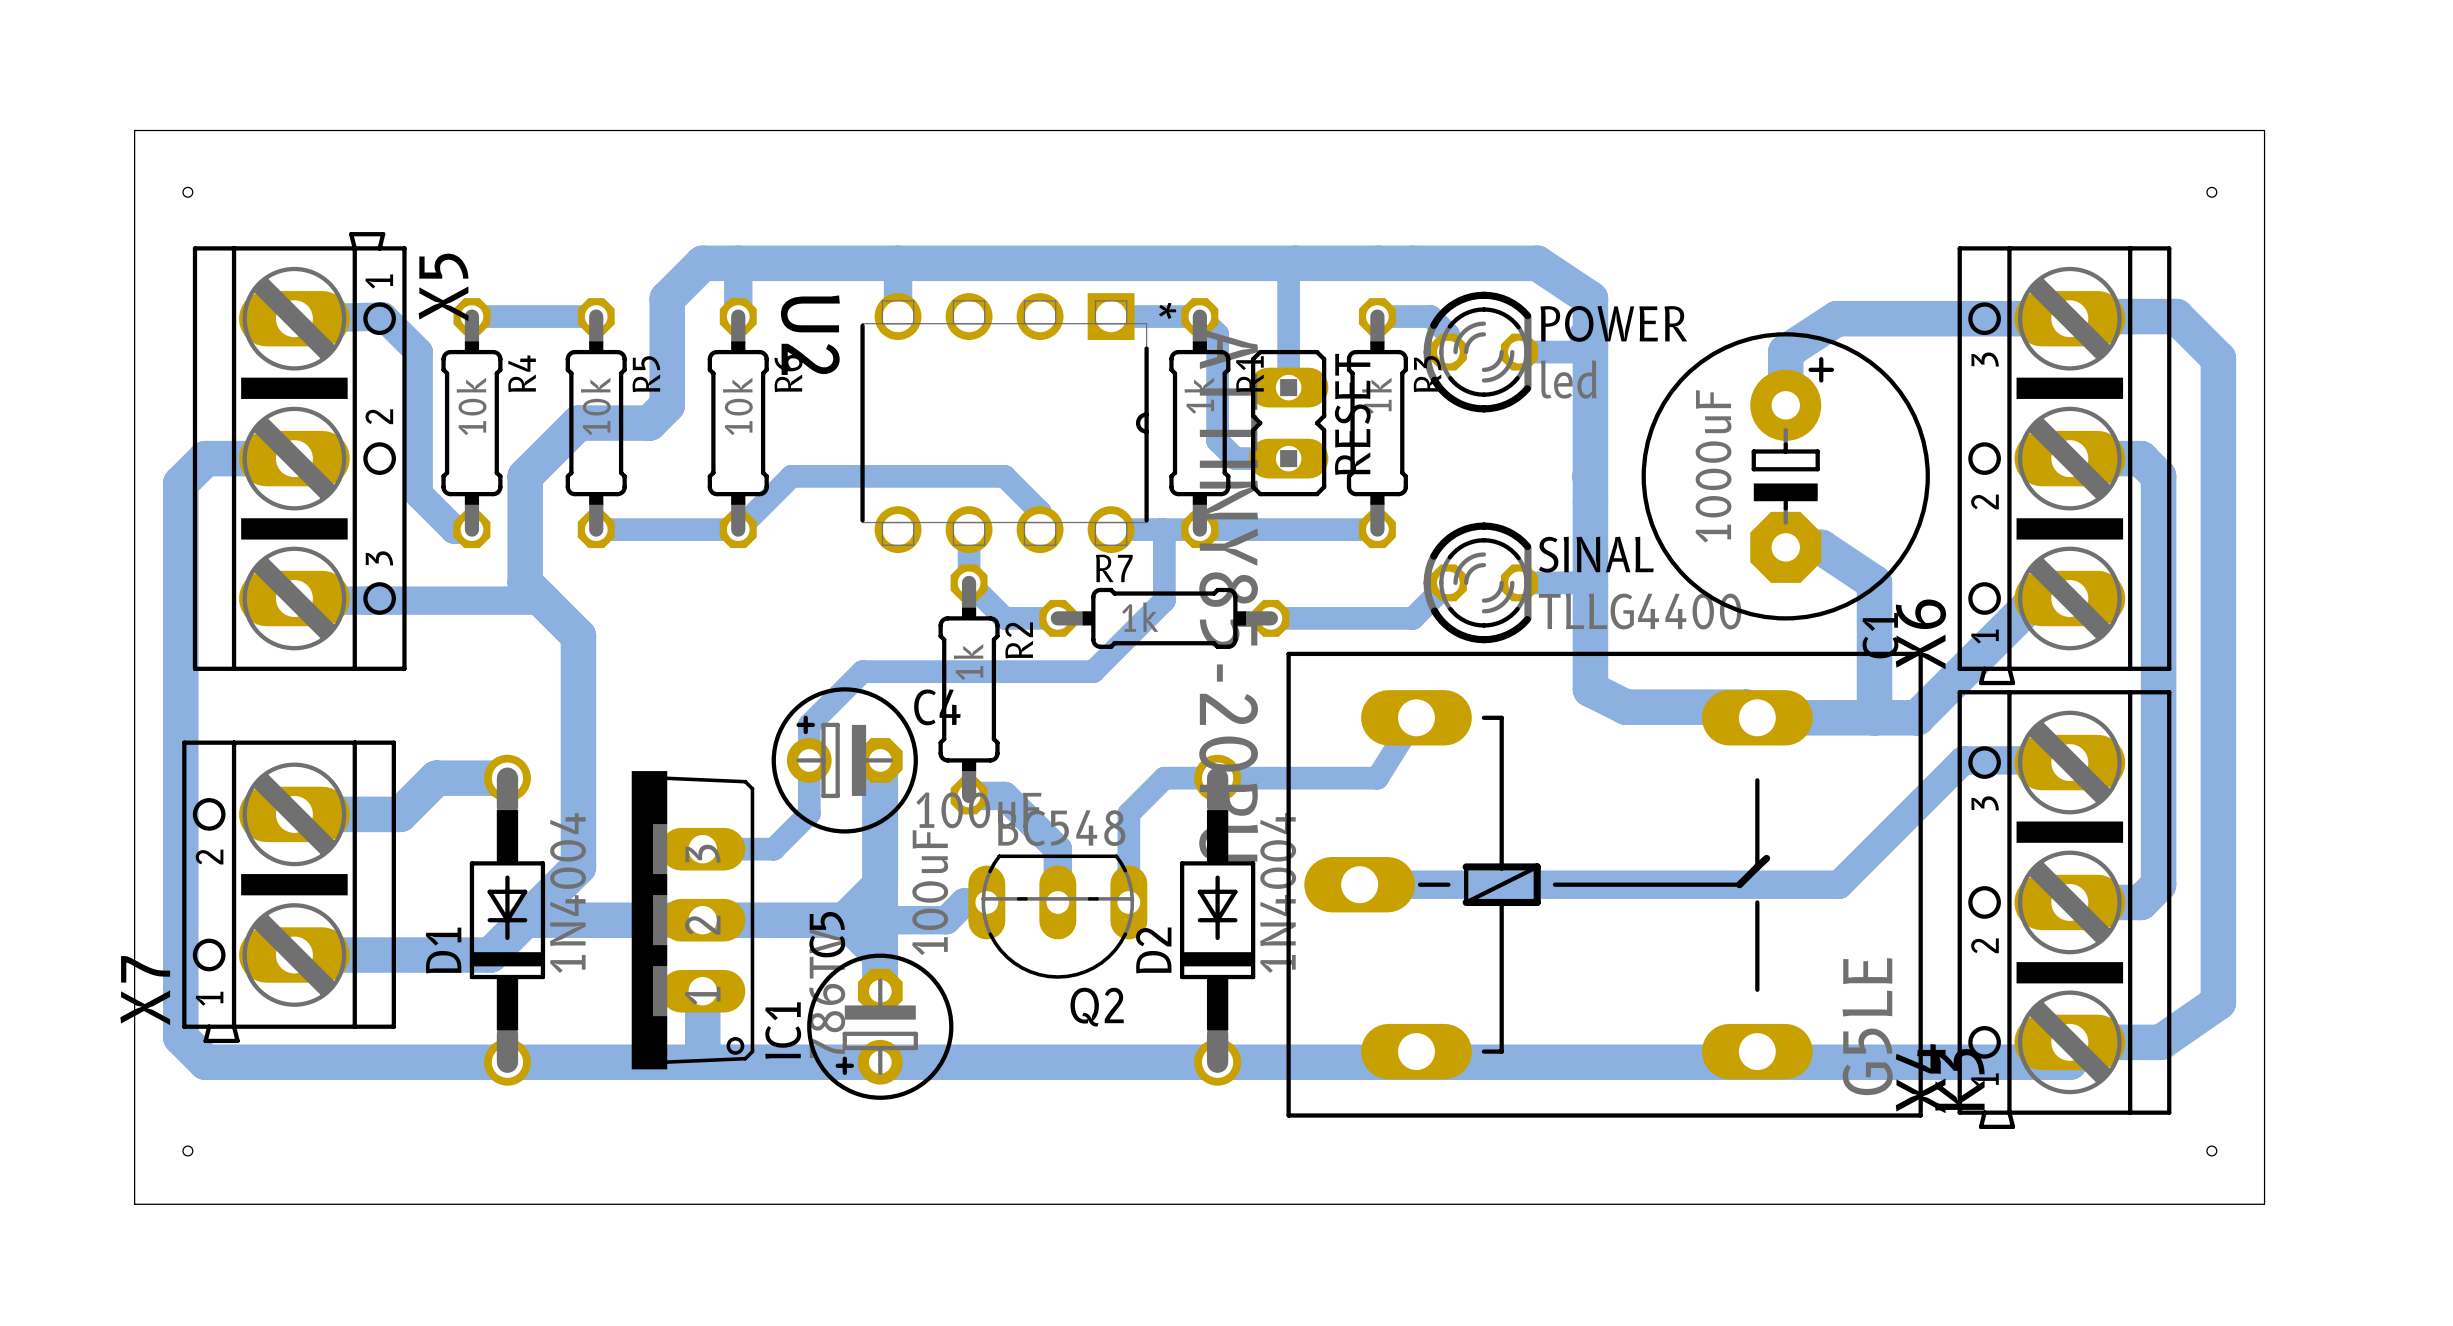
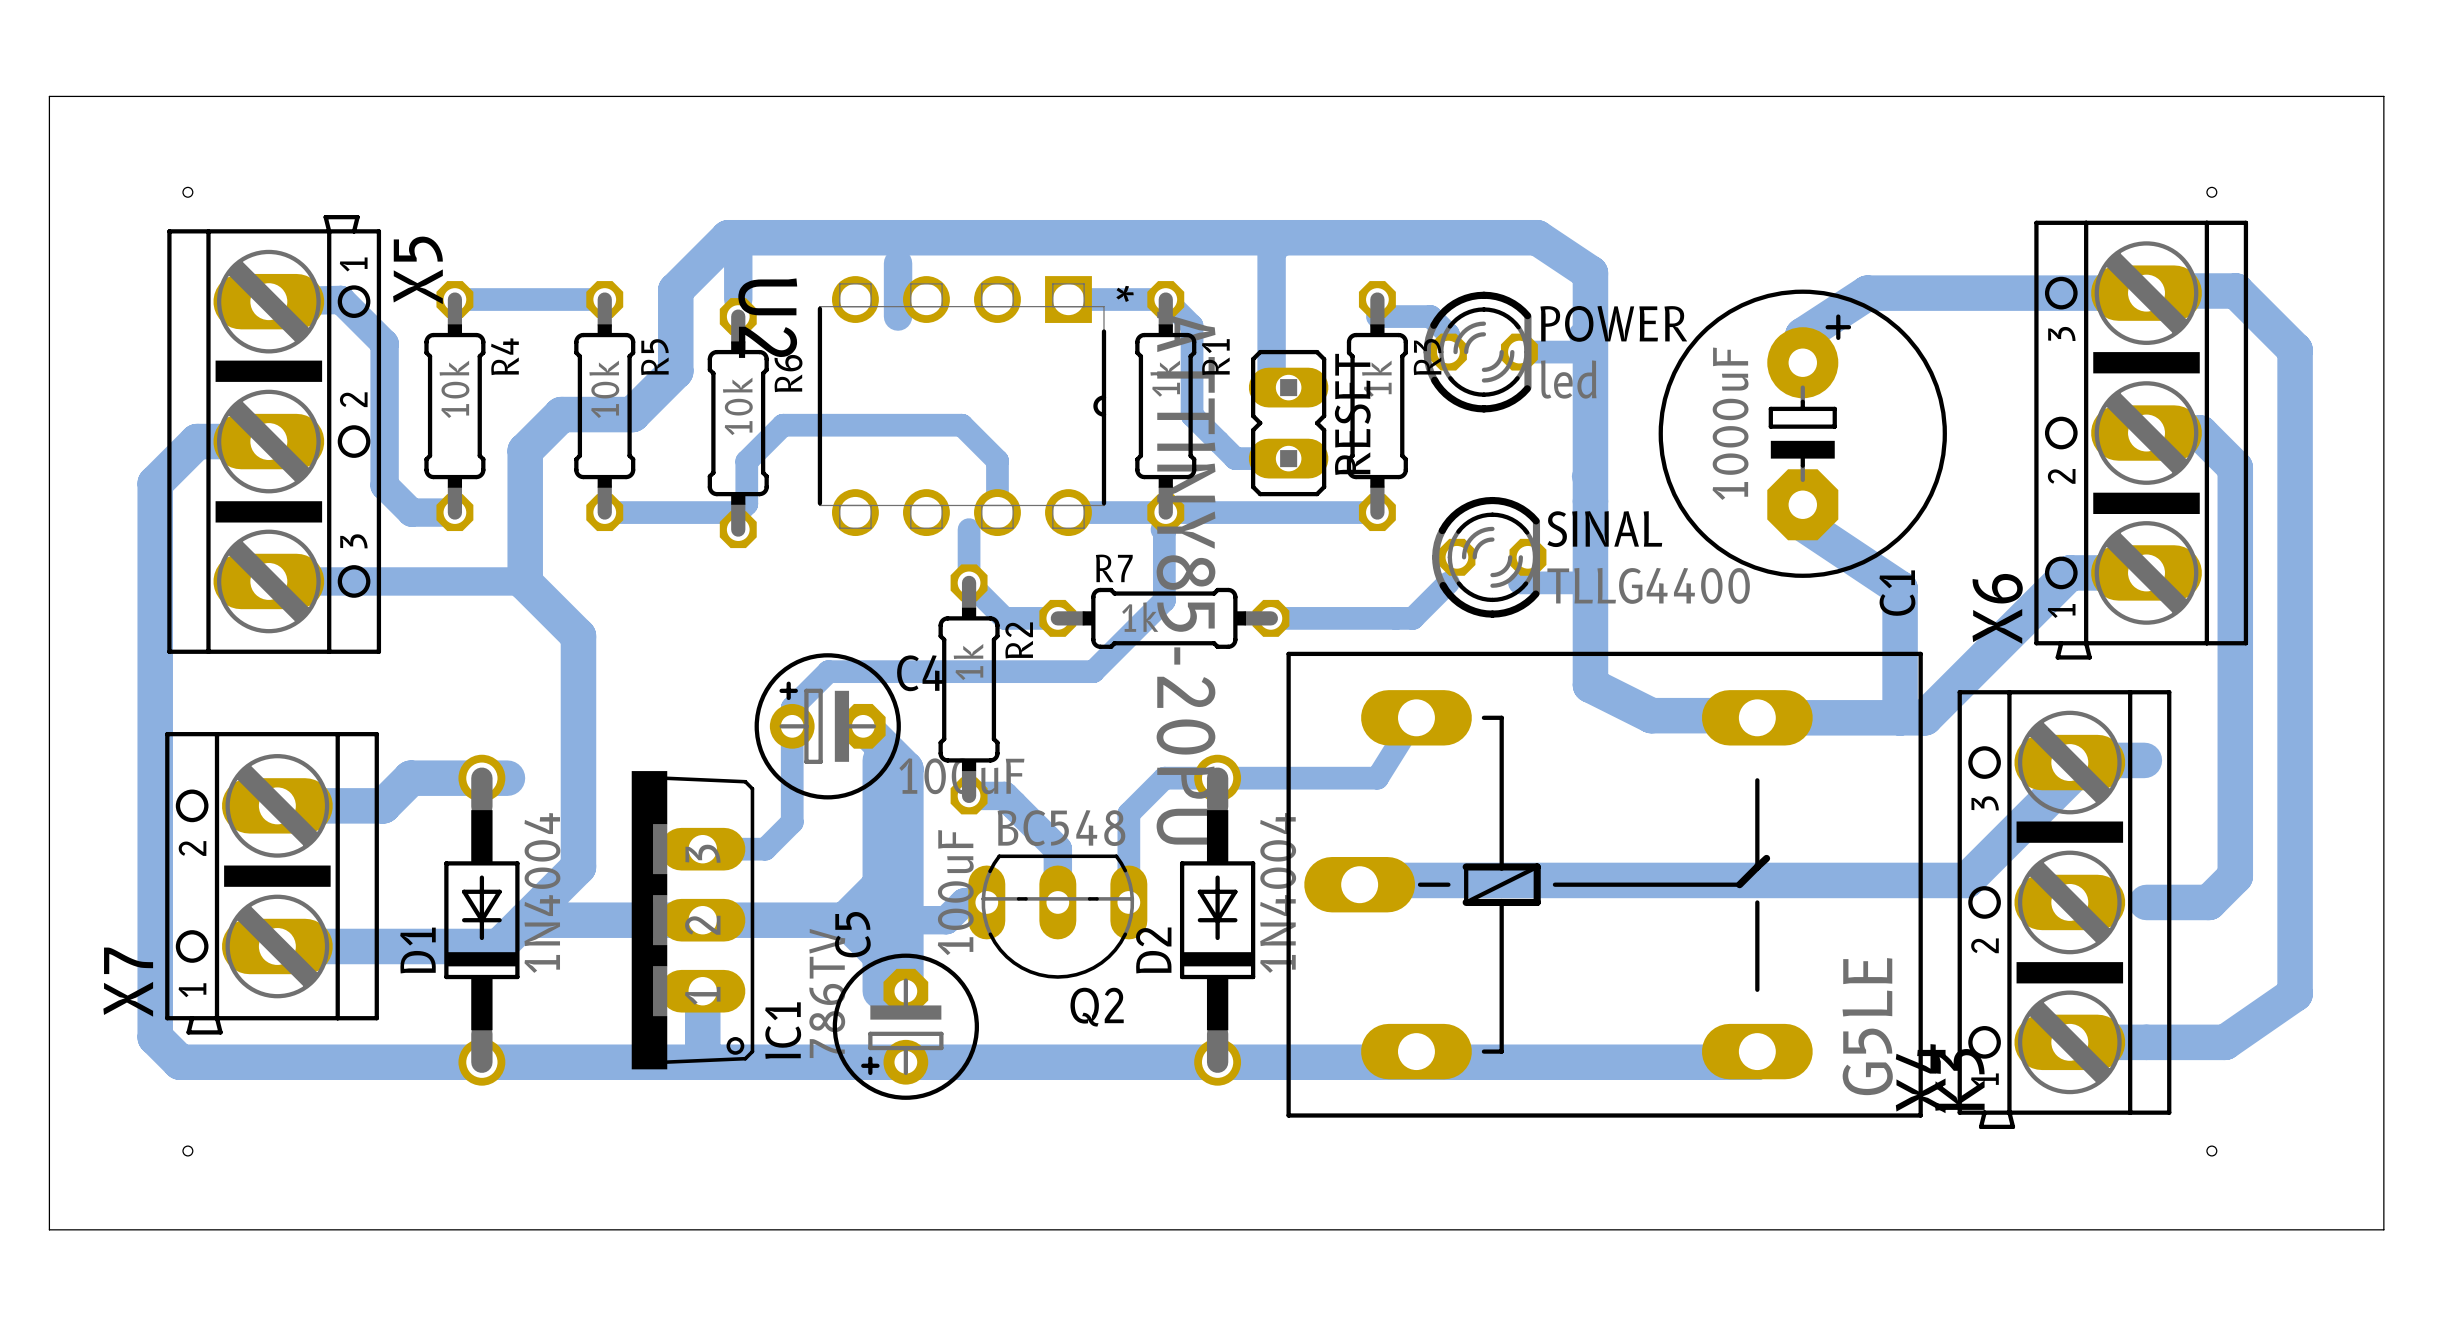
board edge: (134, 130) (2264, 130) (2264, 1204) (134, 1204) (134, 130) -> (49, 96) (49, 1229) (2383, 1229) (2383, 96) (49, 96)
bottom track: none -> (1271, 235) (1271, 370) (1271, 251) (1285, 237)
bottom track: (702, 263) (1537, 263) (1590, 298) -> (702, 263) (728, 237) (1537, 237) (1590, 273) (1590, 298)
bottom track: (1295, 263) (1288, 270) (1288, 387) -> none
bottom track: (675, 290) (667, 298) (667, 405) (649, 423) (578, 423) (525, 476) -> (675, 290) (675, 371) (632, 414) (561, 414) (525, 450) (525, 476)
bottom track: none -> (454, 299) (604, 299)
bottom track: none -> (268, 301) (340, 299) (384, 343) (384, 485) (411, 512) (454, 512)
bottom track: (471, 316) (596, 316) -> none
bottom track: (1111, 316) (1199, 316) (1217, 334) (1217, 440) -> (1068, 299) (1165, 299) (1192, 325) (1192, 415) (1217, 440)
bottom track: (294, 318) (383, 316) (418, 352) (418, 494) (454, 529) (471, 529) -> none
bottom track: (1785, 405) (1785, 352) (1836, 318) (2176, 316) (2218, 358) (2218, 1002) (2160, 1042) -> (1802, 362) (1802, 335) (1867, 293) (2146, 293) (2148, 291) (2235, 291) (2295, 350) (2295, 993) (2225, 1042) (2160, 1042)
R4 position: (471, 423) -> (454, 406)
R5 position: (596, 423) -> (604, 406)
U2 position: (1004, 423) -> (961, 406)
R1 position: (1199, 423) -> (1165, 406)
R3 position: (1377, 423) -> (1377, 406)
bottom track: none -> (2146, 433) (2200, 433) (2235, 467) (2235, 876) (2209, 902) (2146, 902)
X5 position: (299, 451) -> (274, 434)
bottom track: (292, 458) (296, 461) (294, 458) (205, 458) (180, 483) (180, 1037) (205, 1062) -> (268, 441) (197, 441) (155, 483) (155, 1037) (180, 1062) (205, 1062)
bottom track: (2069, 458) (2140, 458) (2158, 476) (2158, 884) (2140, 902) (2069, 902) -> none
X6 position: (2064, 465) -> (2141, 440)
C1 position: (1785, 476) -> (1802, 433)
bottom track: none -> (1802, 504) (1801, 523) (1900, 588) (1900, 717)
bottom track: none -> (604, 512) (738, 512) (746, 504) (746, 461) (783, 425) (961, 425) (997, 460) (997, 512)
bottom track: none -> (1068, 512) (1377, 512)
bottom track: (596, 529) (738, 529) (791, 476) (1004, 476) (1040, 511) (1040, 529) -> none
bottom track: (1111, 529) (1377, 529) -> none
bottom track: (1785, 547) (1821, 547) (1874, 582) (1874, 717) -> none
bottom track: none -> (268, 581) (525, 582)
SINAL position: (1480, 582) -> (1489, 557)
bottom track: (2069, 598) (2067, 600) (2034, 600) (1917, 717) -> (2146, 572) (2069, 572) (1924, 717) (1917, 717)
bottom track: (296, 600) (542, 600) -> none
bottom track: (862, 671) (809, 724) (809, 813) (773, 849) (765, 849) -> (862, 671) (828, 671) (792, 707) (792, 822) (765, 849)
bottom track: (1590, 685) (1590, 689) (1625, 707) (1746, 707) (1757, 717) (1750, 724) -> (1590, 685) (1651, 715) (1780, 715) (1782, 717) (1775, 724)
bottom track: none -> (863, 726) (905, 768) (905, 991)
C4 position: (844, 760) -> (827, 726)
bottom track: (2069, 762) (2067, 760) (1963, 760) (1839, 884) (1359, 884) -> none
bottom track: none -> (2146, 762) (2144, 760) (2086, 760) (1966, 880) (1389, 880) (1385, 884)
bottom track: (436, 778) (400, 814) (294, 814) -> (436, 778) (410, 778) (383, 805) (277, 805)
X7 position: (289, 891) -> (272, 883)
D1 position: (507, 920) -> (481, 920)
bottom track: (498, 946) (490, 955) (294, 955) -> (498, 946) (277, 946)
C5 position: (880, 1026) -> (905, 1026)
bottom track: (2060, 1051) (2069, 1042) (2069, 1062) (1757, 1062) -> none

